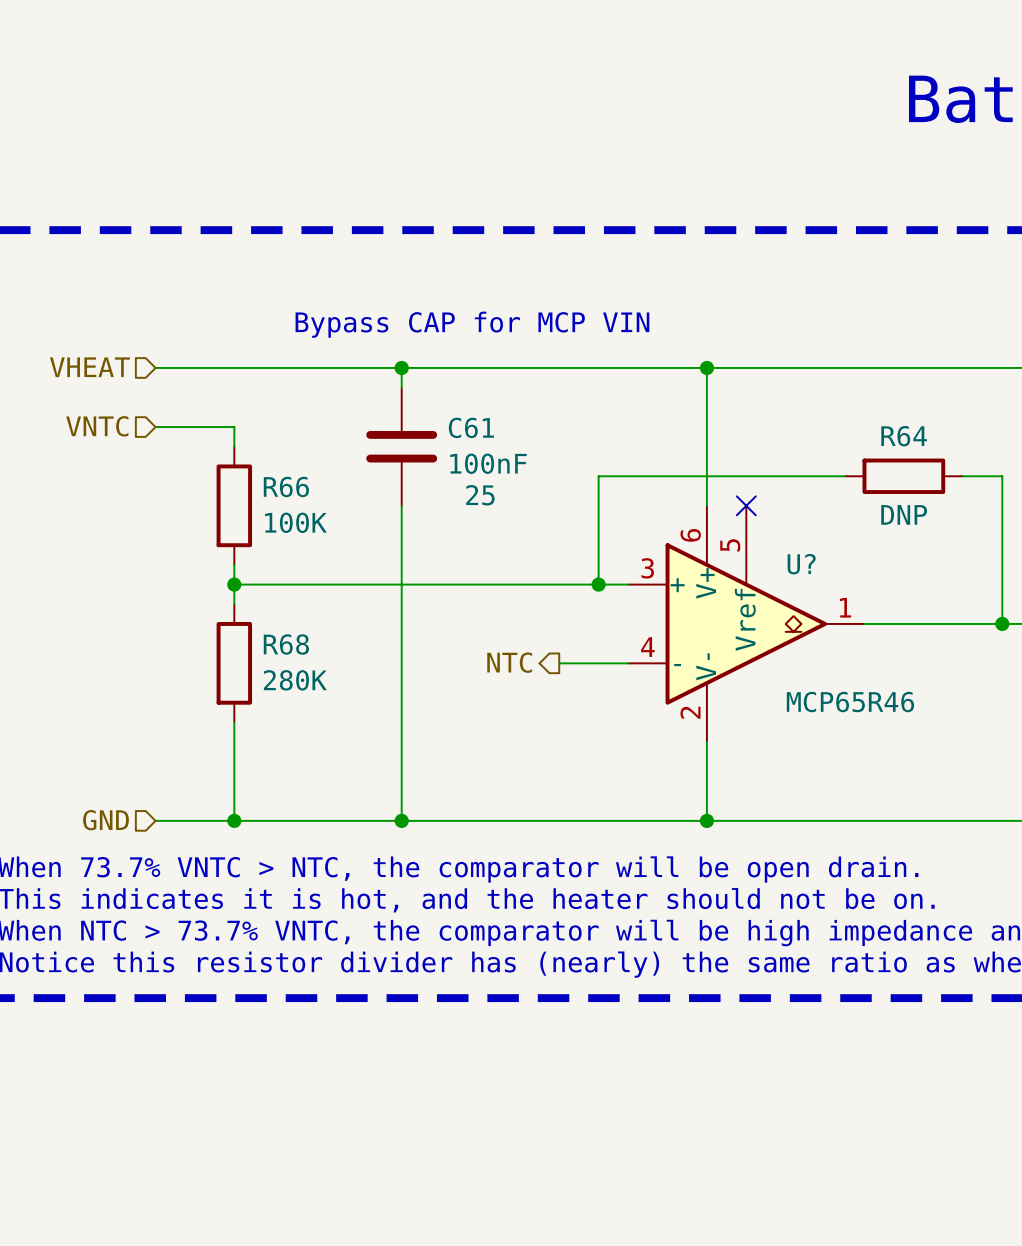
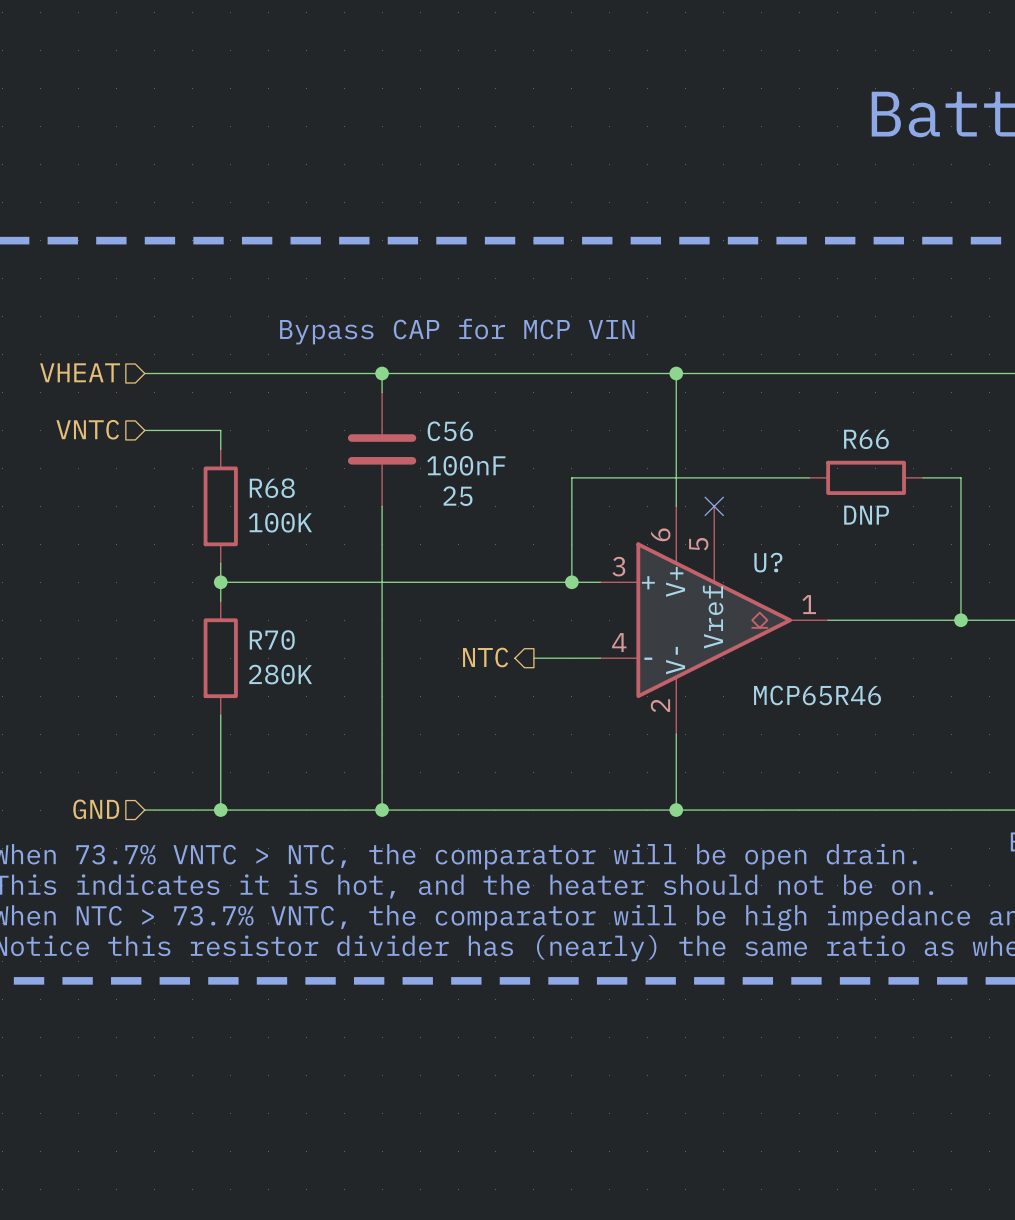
C61 name: C61 (471, 427) -> C56 (450, 431)
R64 name: R64 (904, 436) -> R66 (866, 439)
R66 name: R66 (286, 486) -> R68 (272, 488)
R68 name: R68 (286, 644) -> R70 (272, 640)

